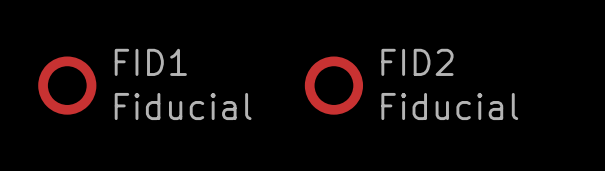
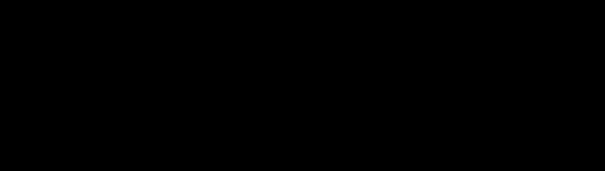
FID1: Fiducial (67, 85) -> none
FID2: Fiducial (333, 85) -> none

